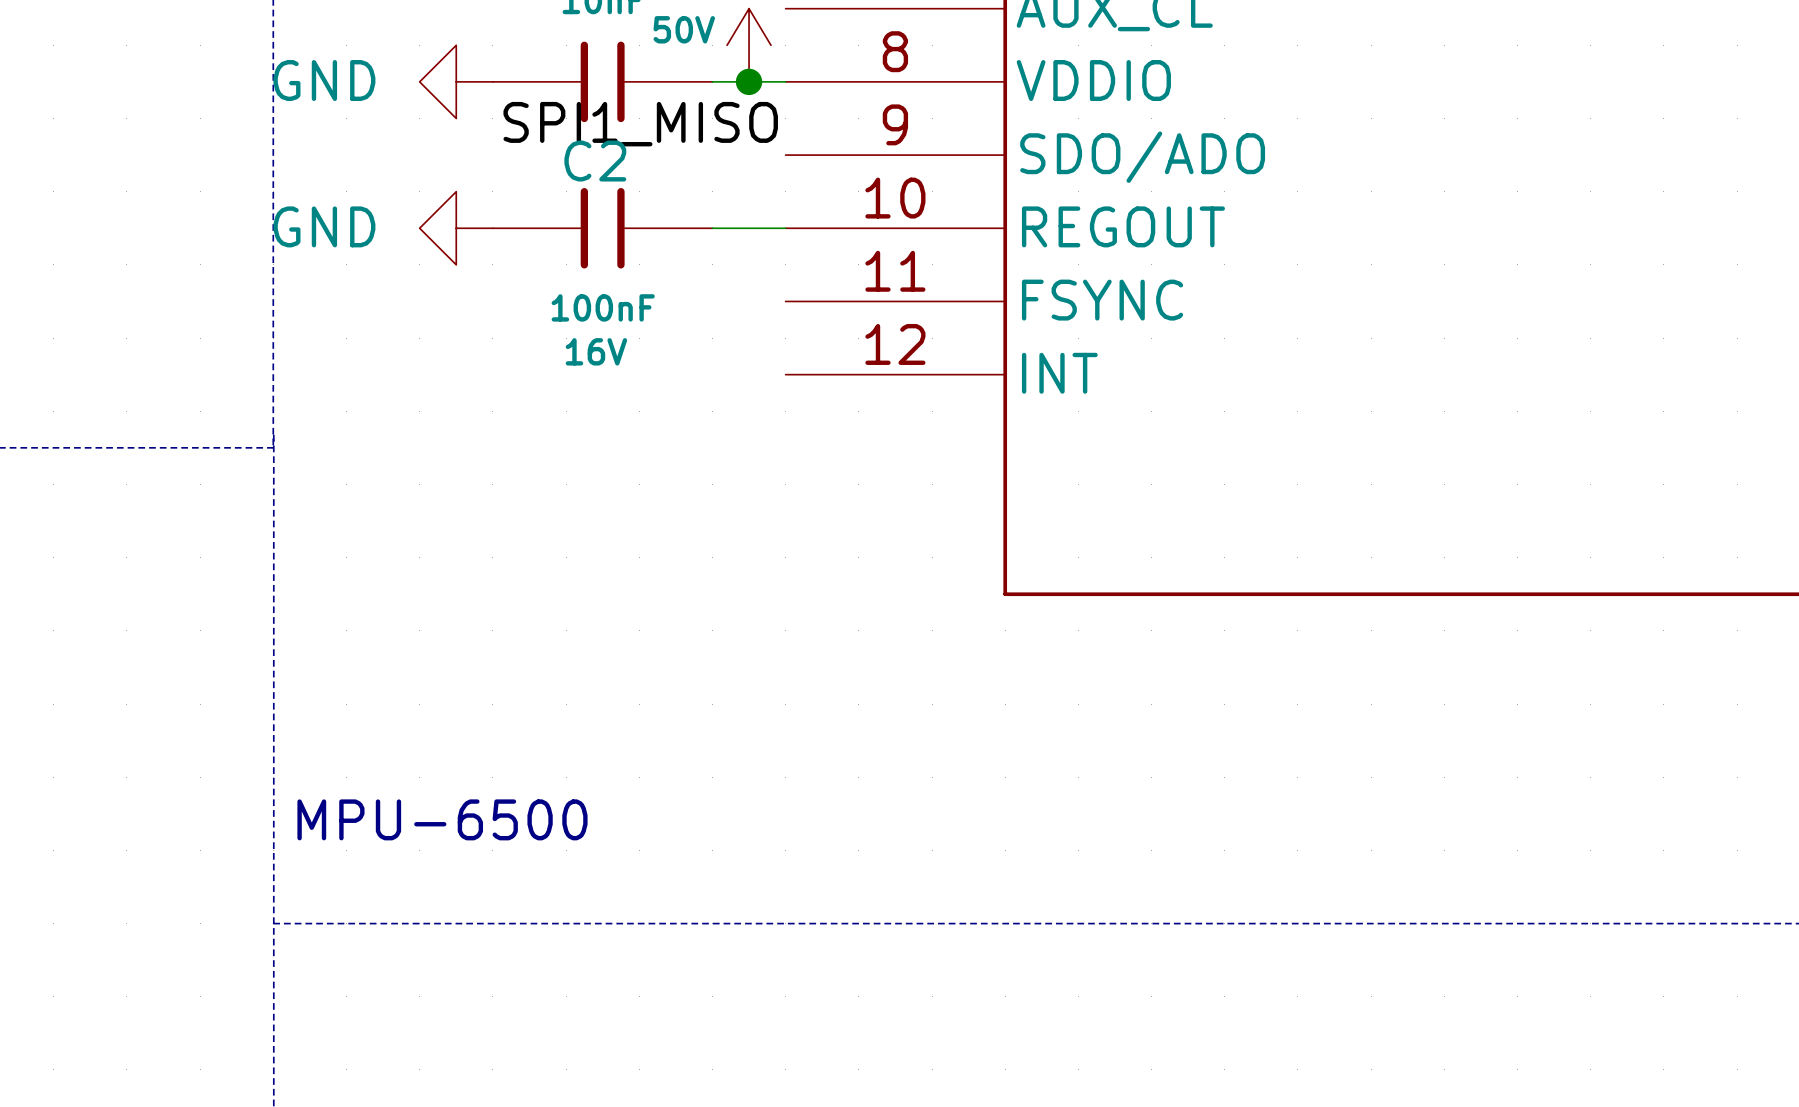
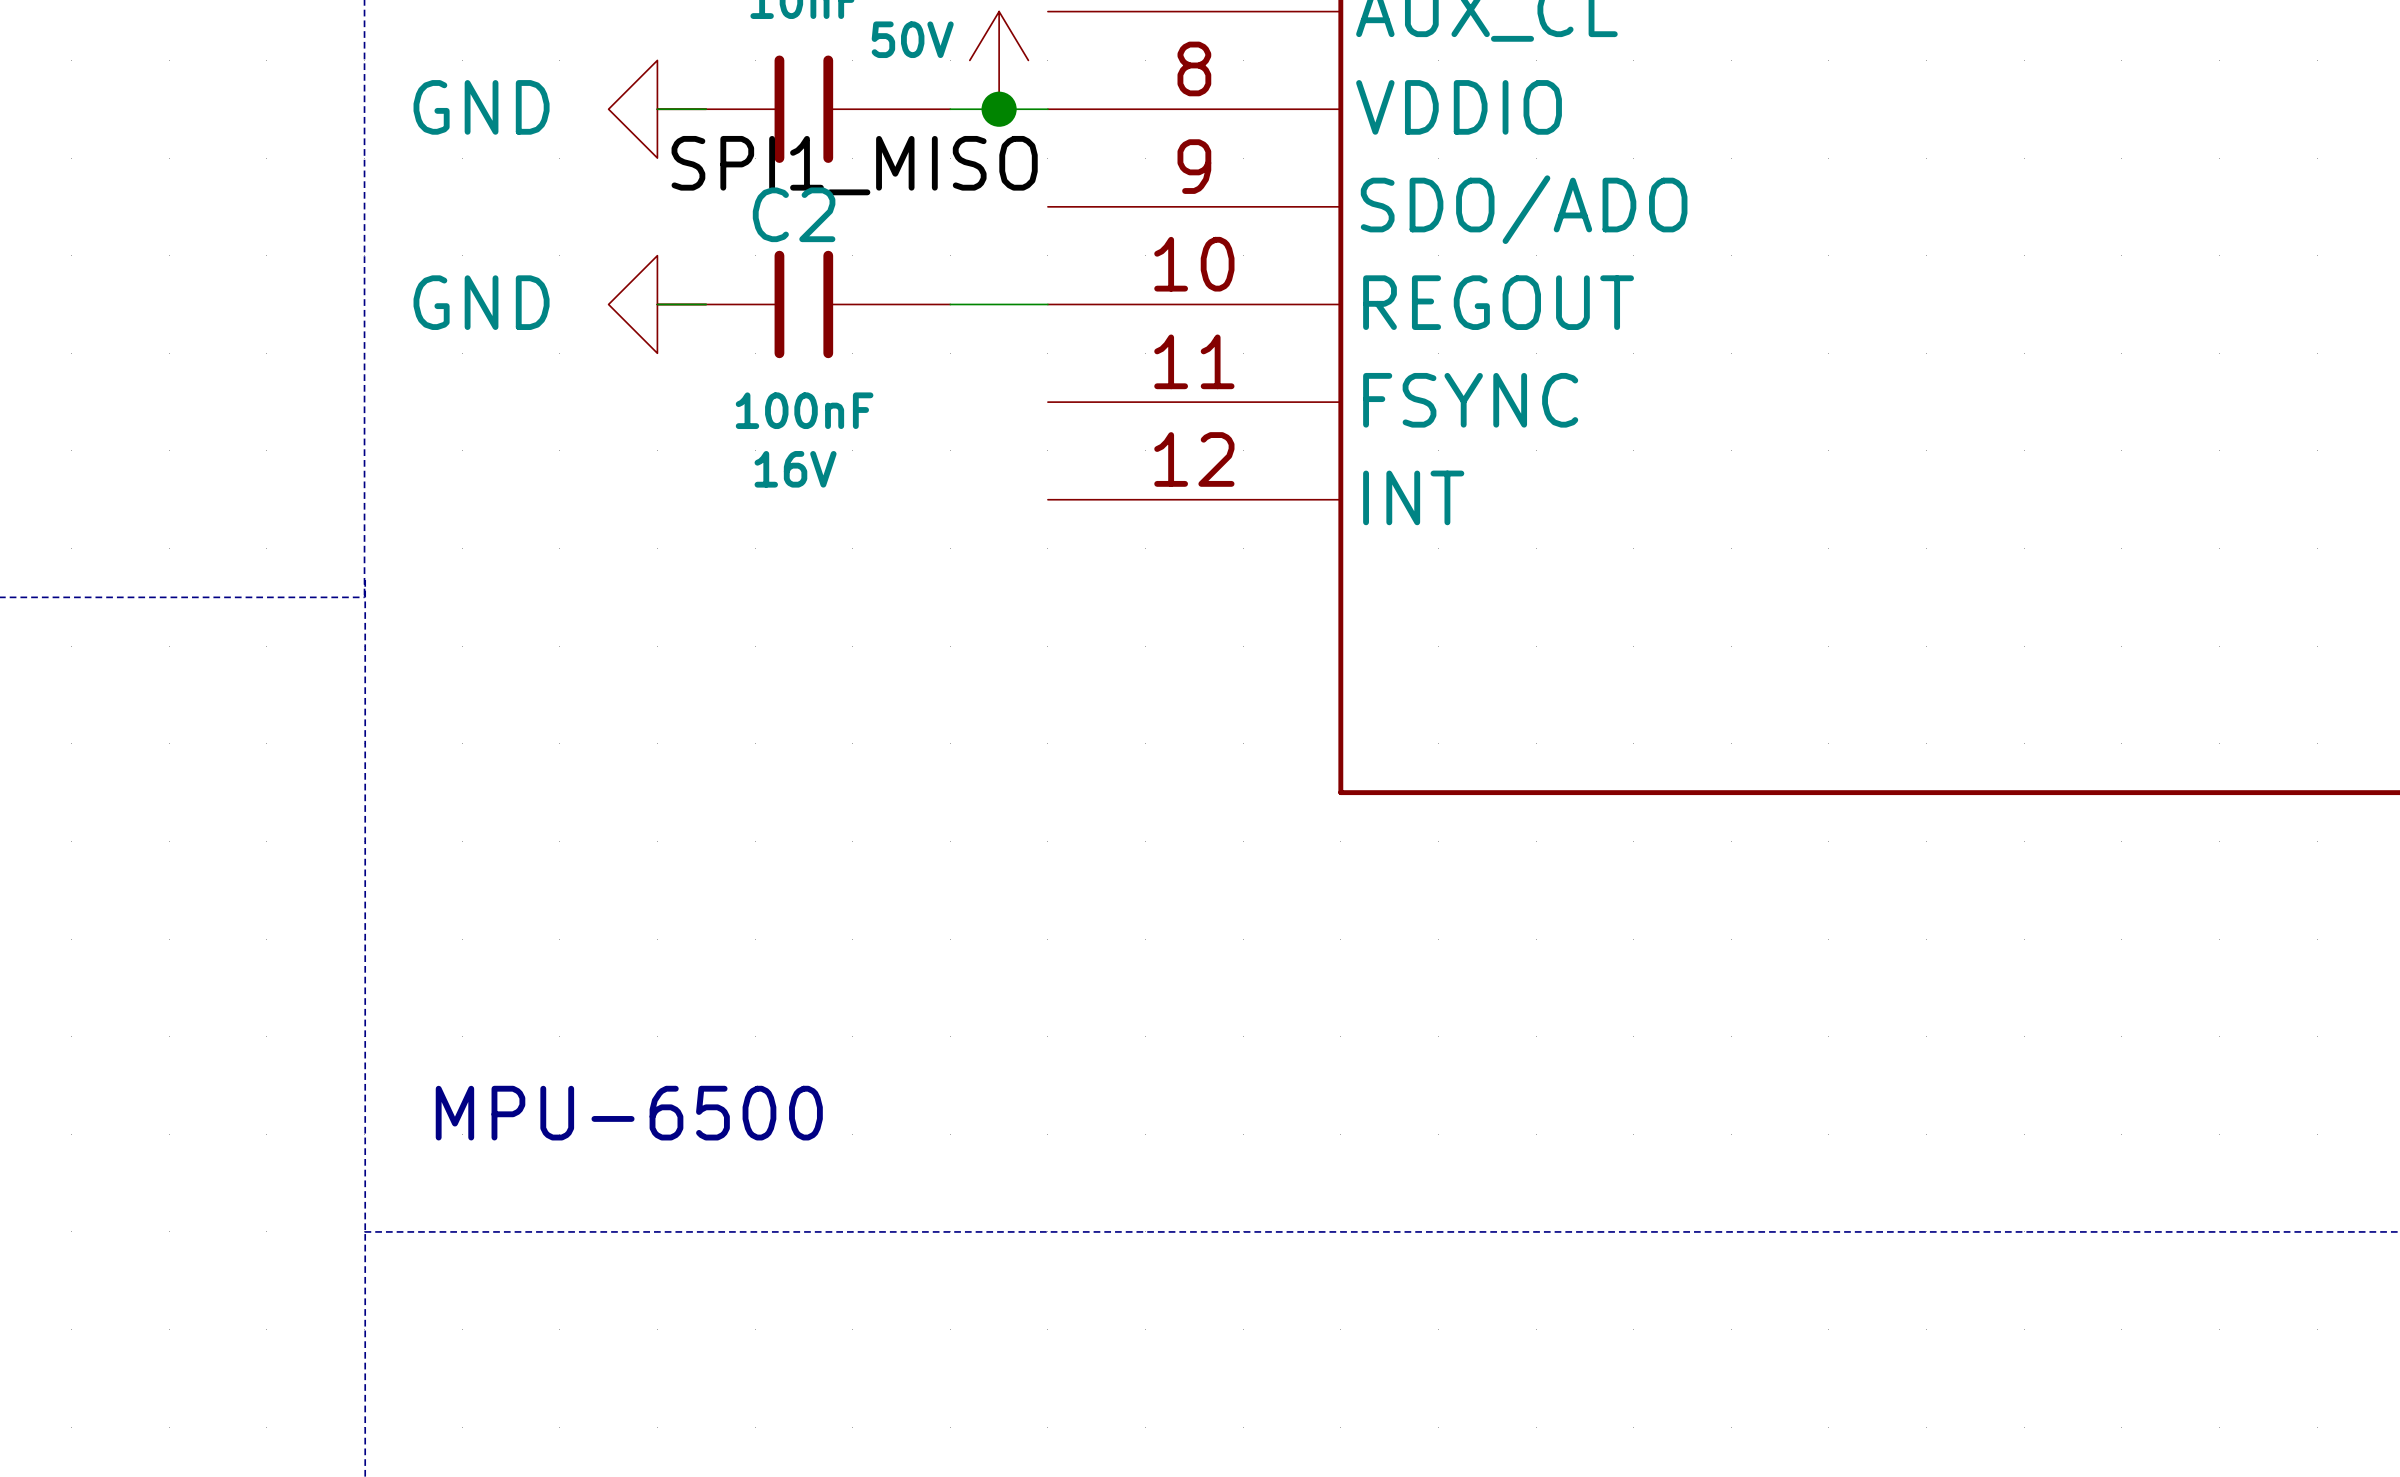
power symbol position: GND (456, 81) -> GND (657, 109)
power symbol position: GND (456, 228) -> GND (657, 304)
text position: MPU-6500 (442, 819) -> MPU-6500 (629, 1113)

